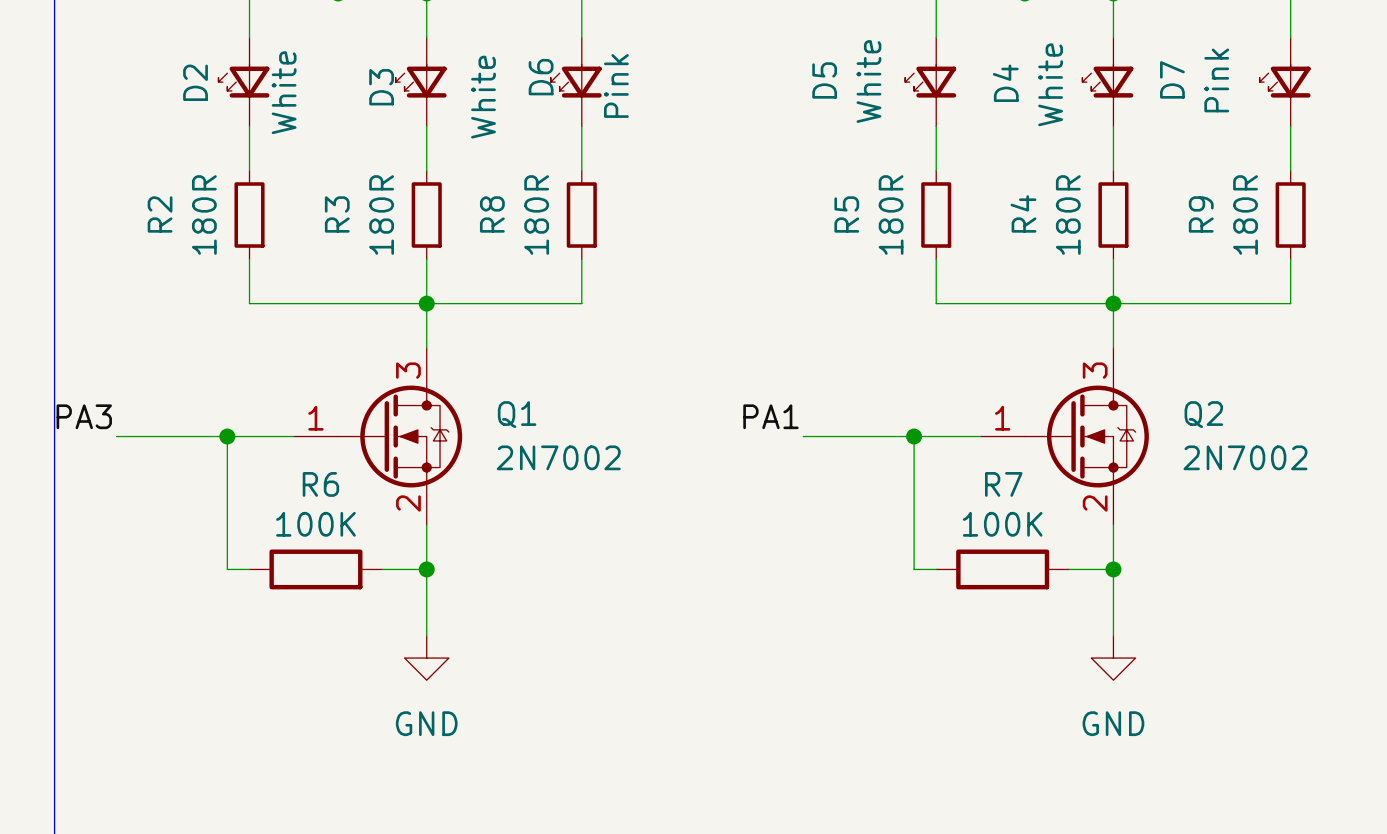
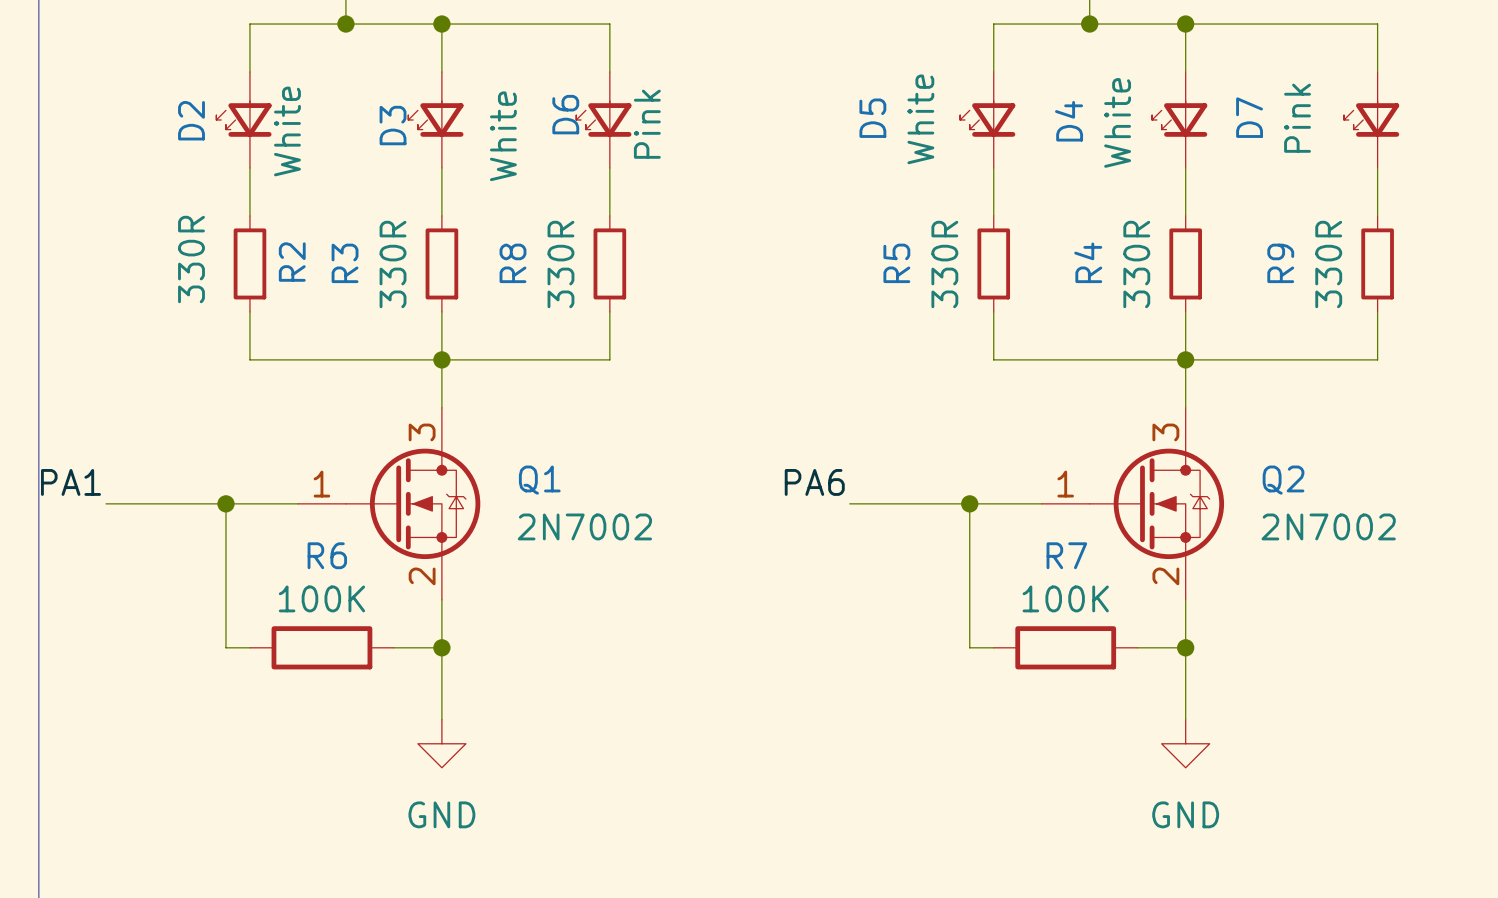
R2 name position: R2 (160, 214) -> R2 (292, 262)
R2 value: 180R (204, 215) -> 330R (191, 259)
R3 value: 180R (381, 215) -> 330R (393, 264)
R8 value: 180R (536, 215) -> 330R (560, 264)
R5 value: 180R (891, 215) -> 330R (944, 264)
R4 value: 180R (1068, 215) -> 330R (1136, 264)
R9 value: 180R (1245, 215) -> 330R (1328, 264)
label: PA3 (84, 416) -> PA1 (70, 482)
label: PA1 (770, 416) -> PA6 (814, 482)

